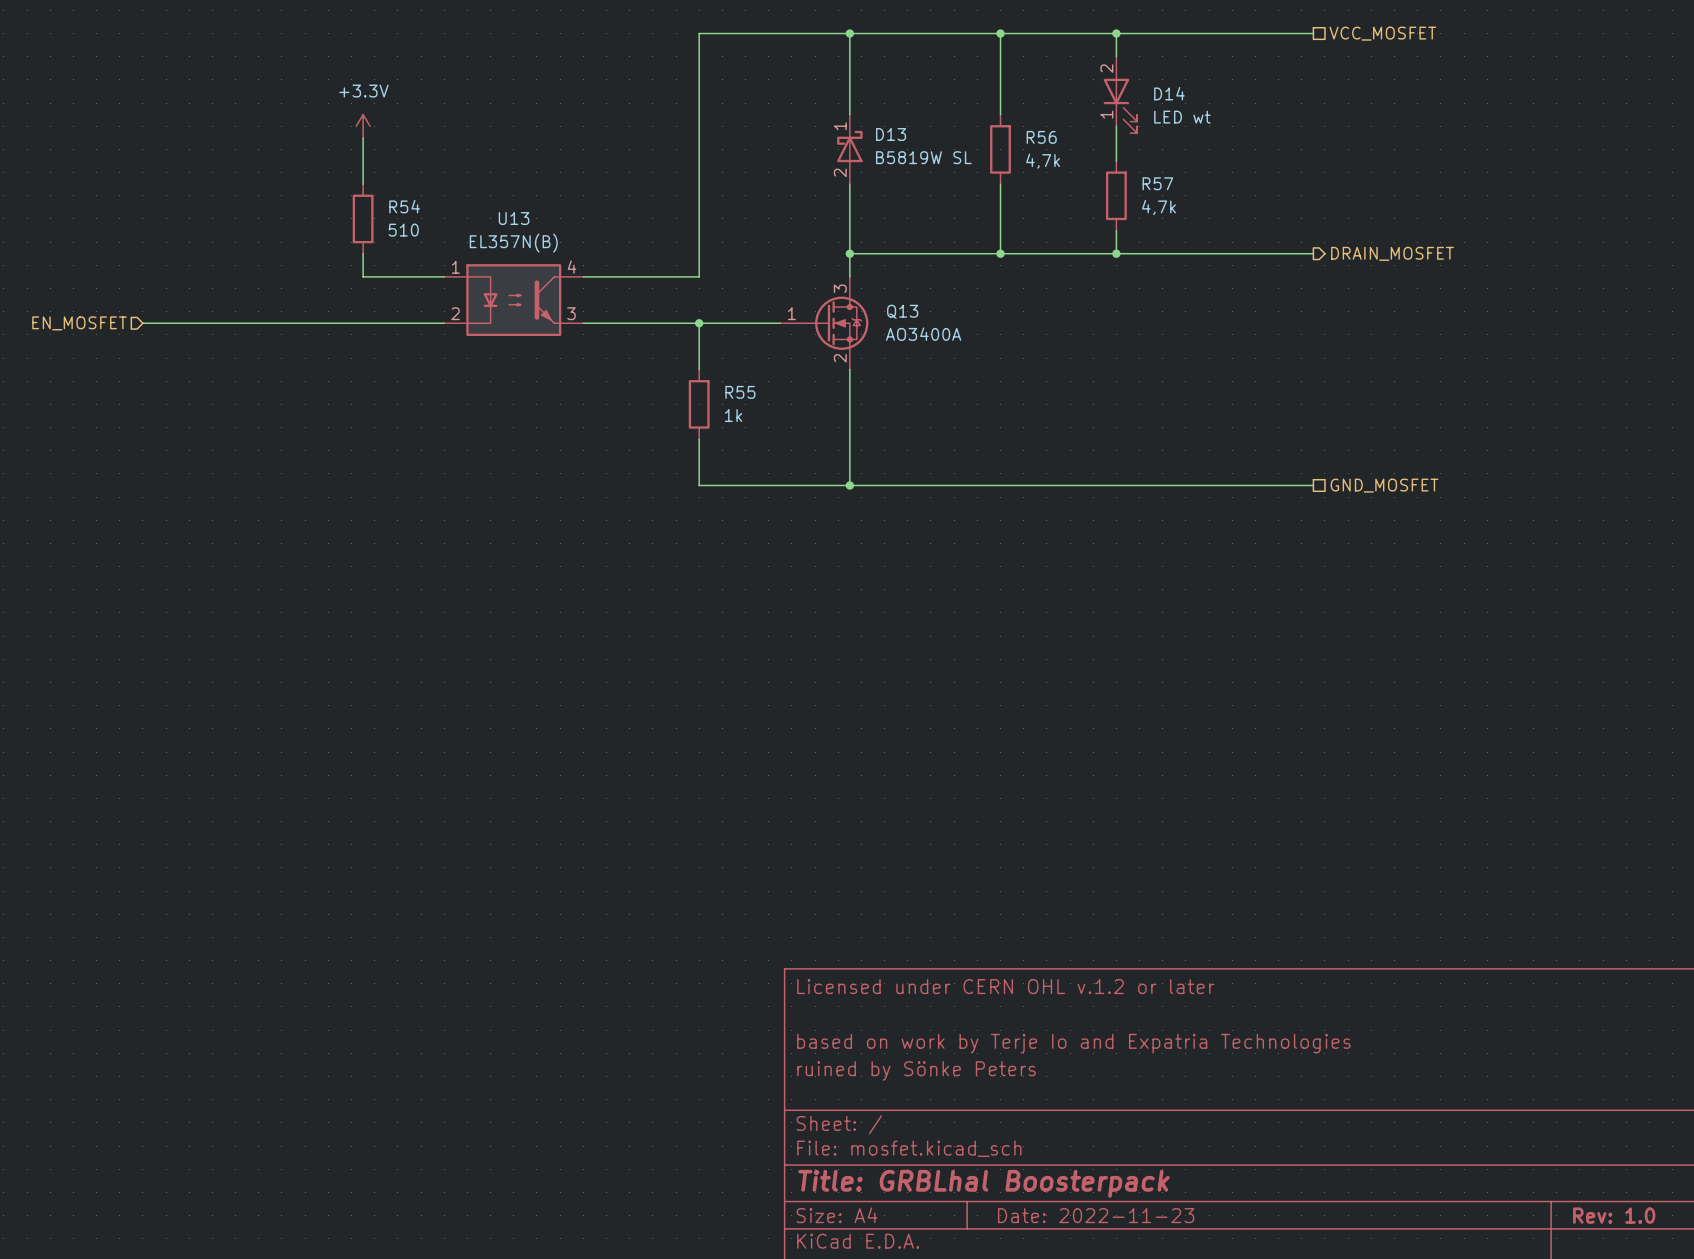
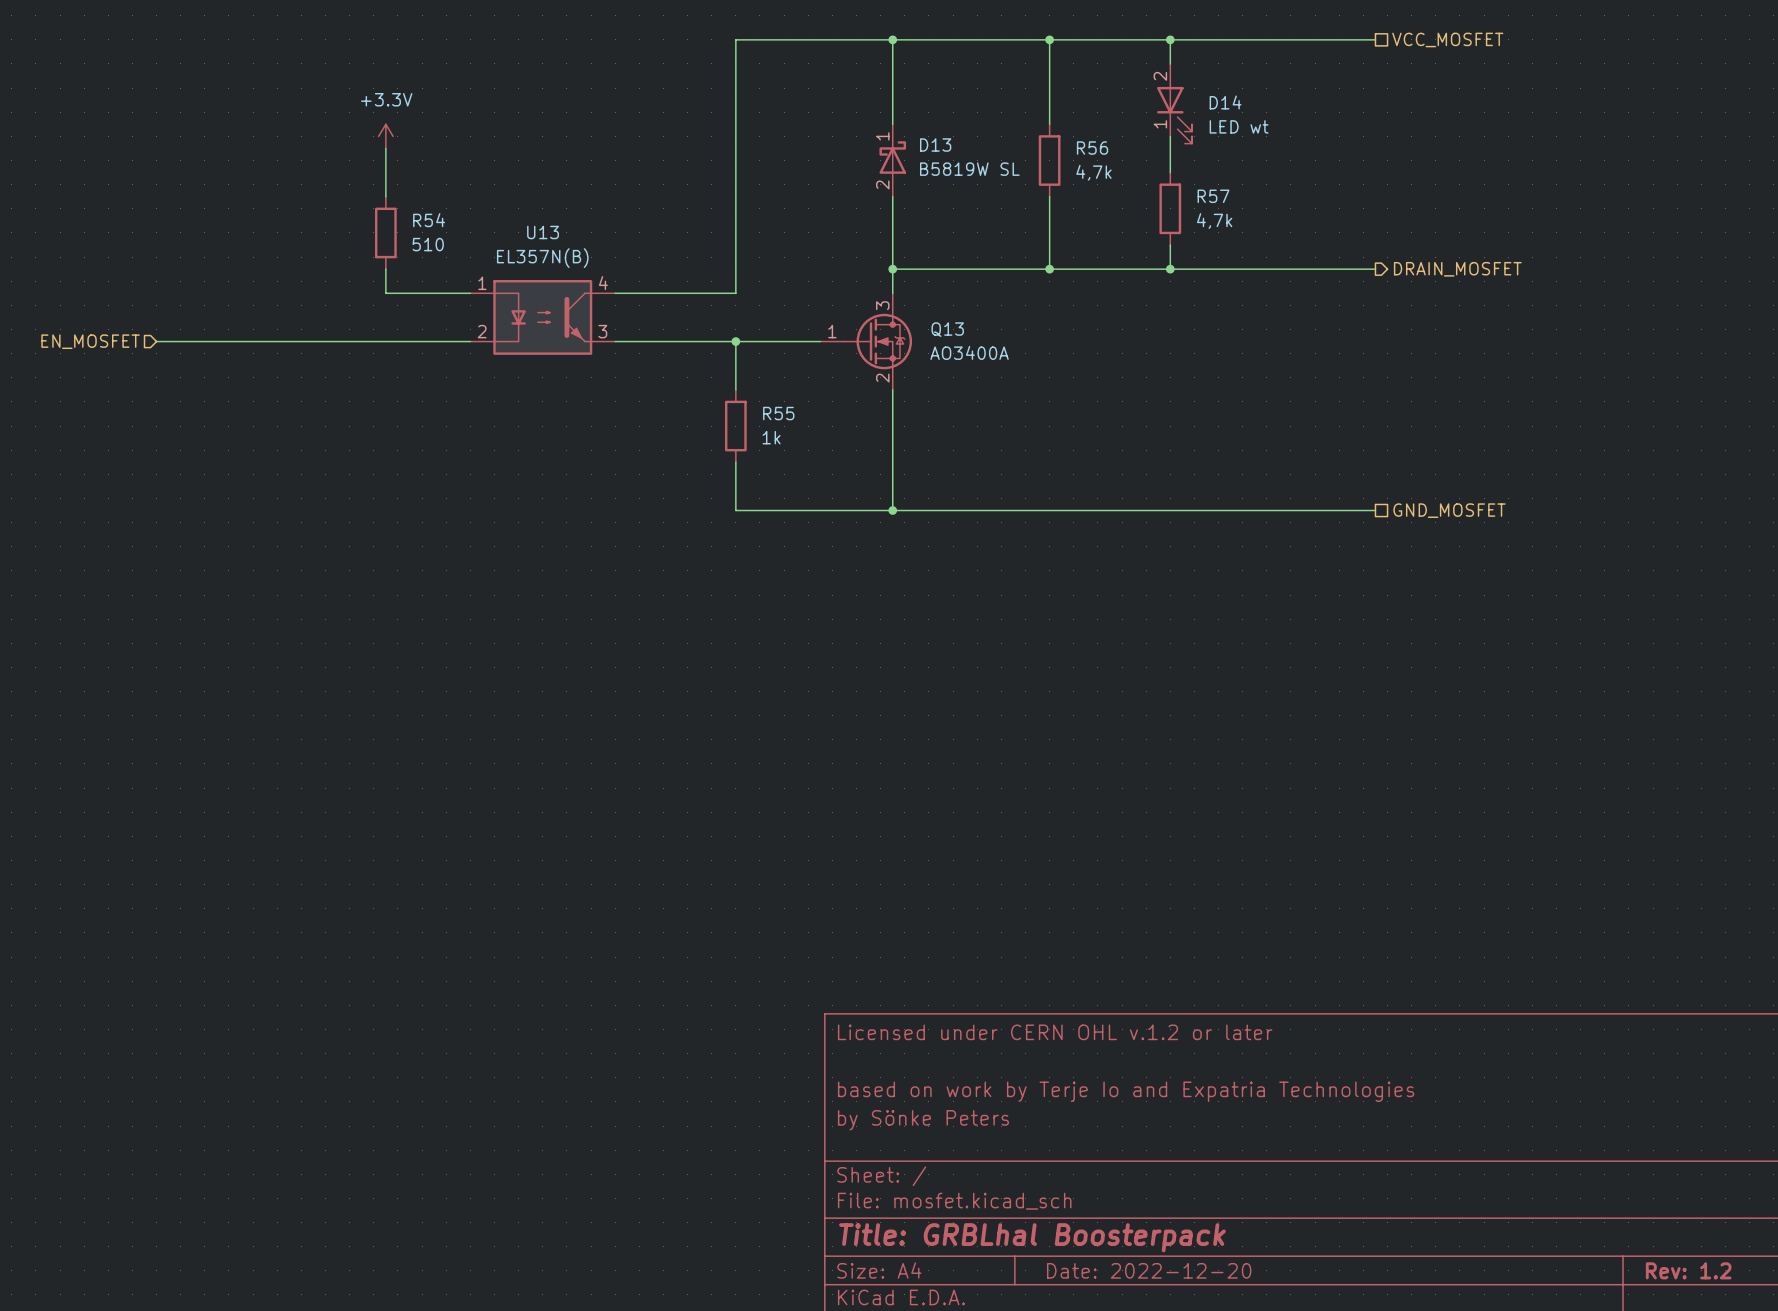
title block: ruined by Sönke Peters (916, 1070) -> by Sönke Peters (923, 1120)
title block: Date: 2022-11-23 (1096, 1215) -> Date: 2022-12-20 (1149, 1270)
title block: Rev: 1.0 (1614, 1215) -> Rev: 1.2 (1688, 1270)

